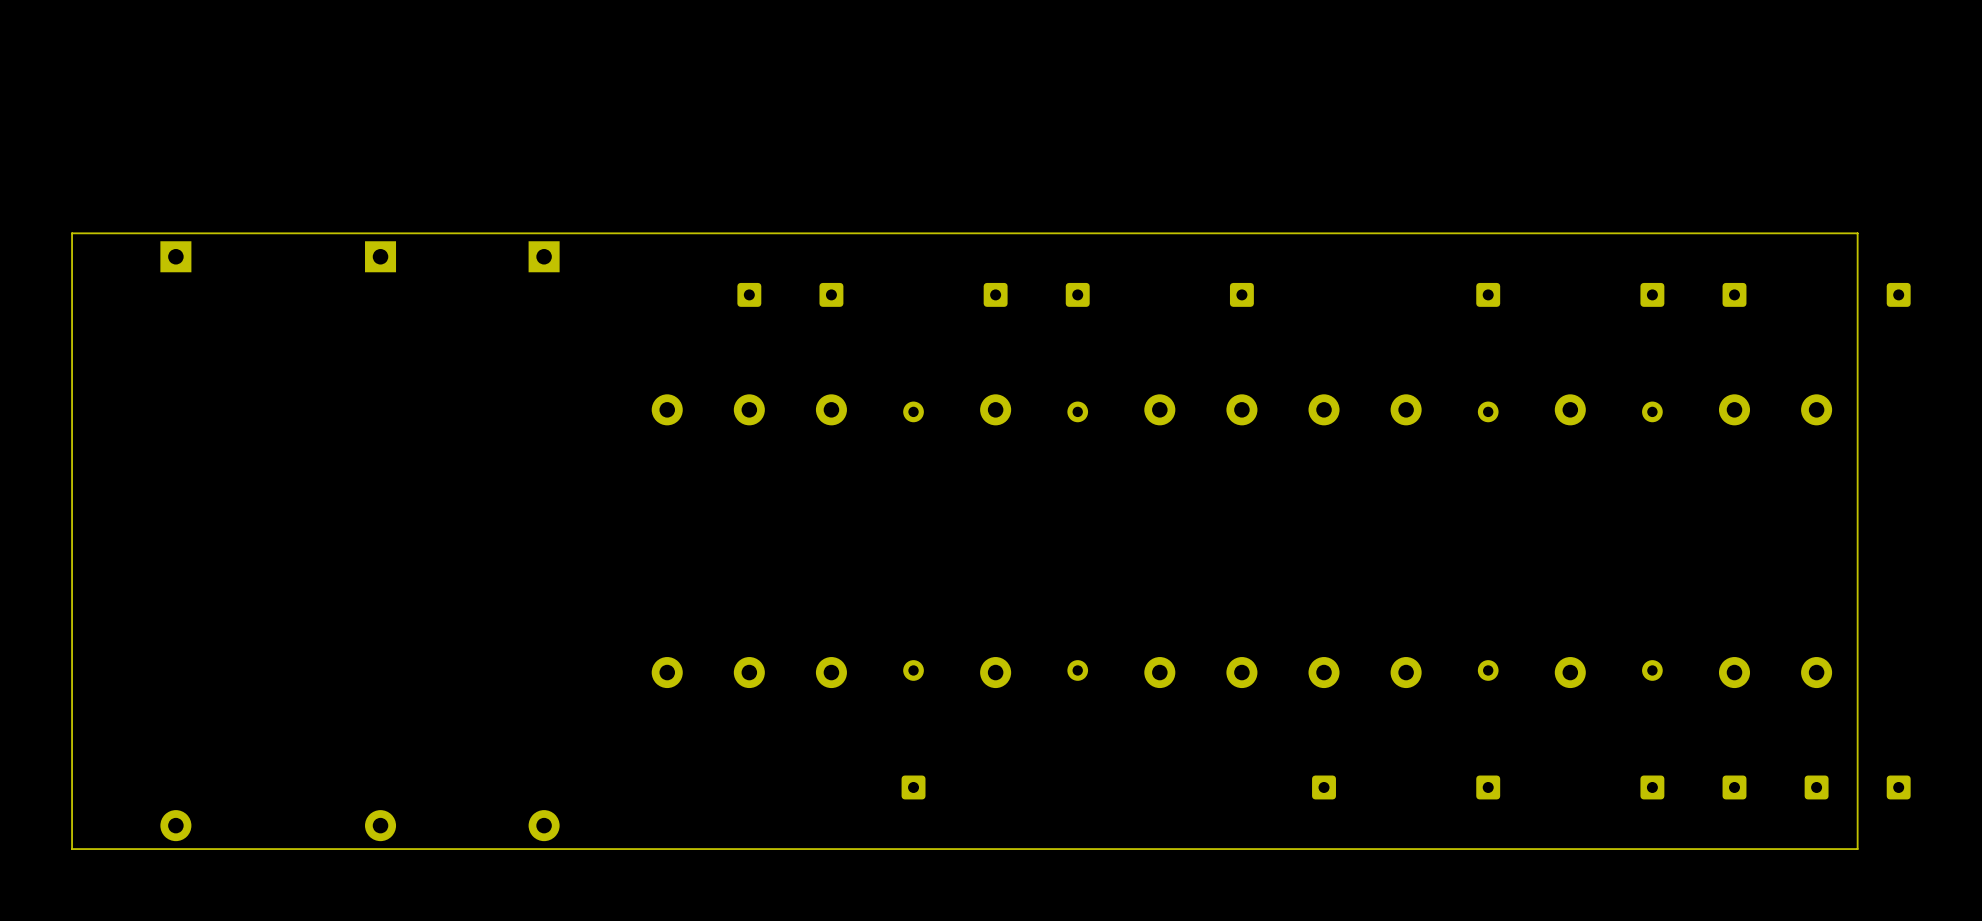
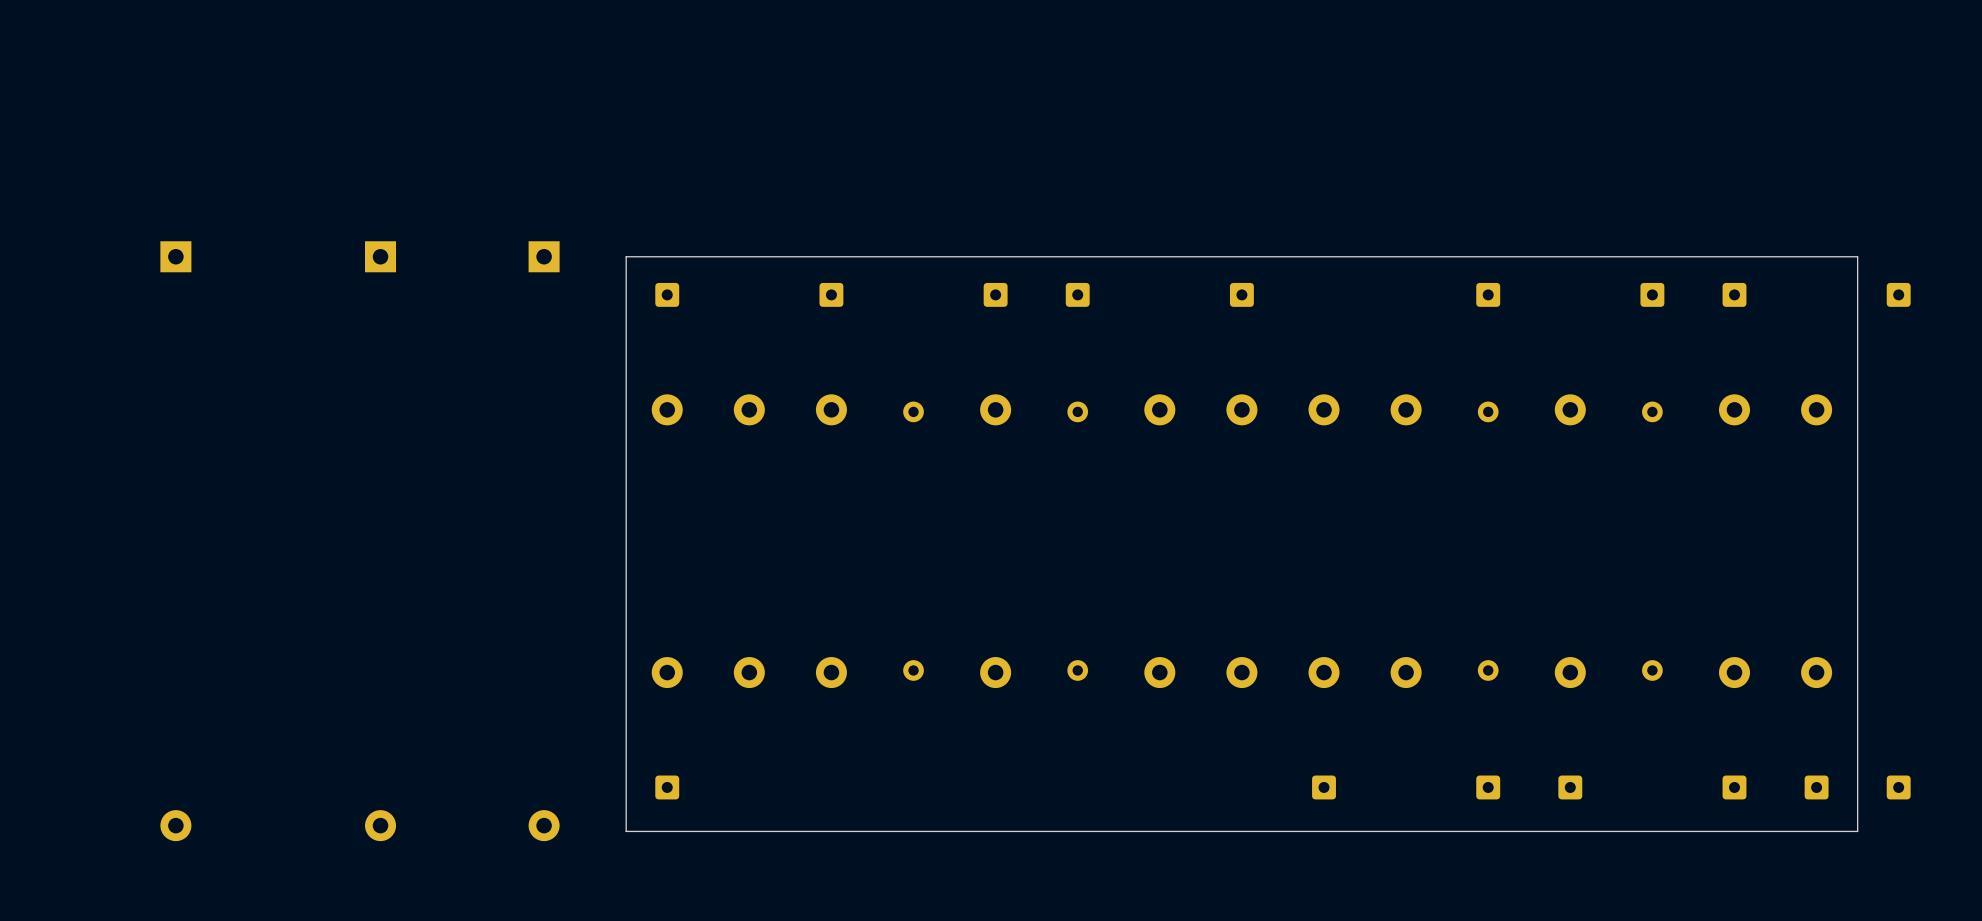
board edge: (1857, 256) (1857, 233) (72, 233) (72, 849) (1857, 849) (1857, 831) -> (1857, 256) (626, 256) (626, 831) (1857, 831)
part position: (749, 294) -> (667, 294)
part position: (913, 787) -> (667, 787)
part position: (1652, 787) -> (1570, 787)

